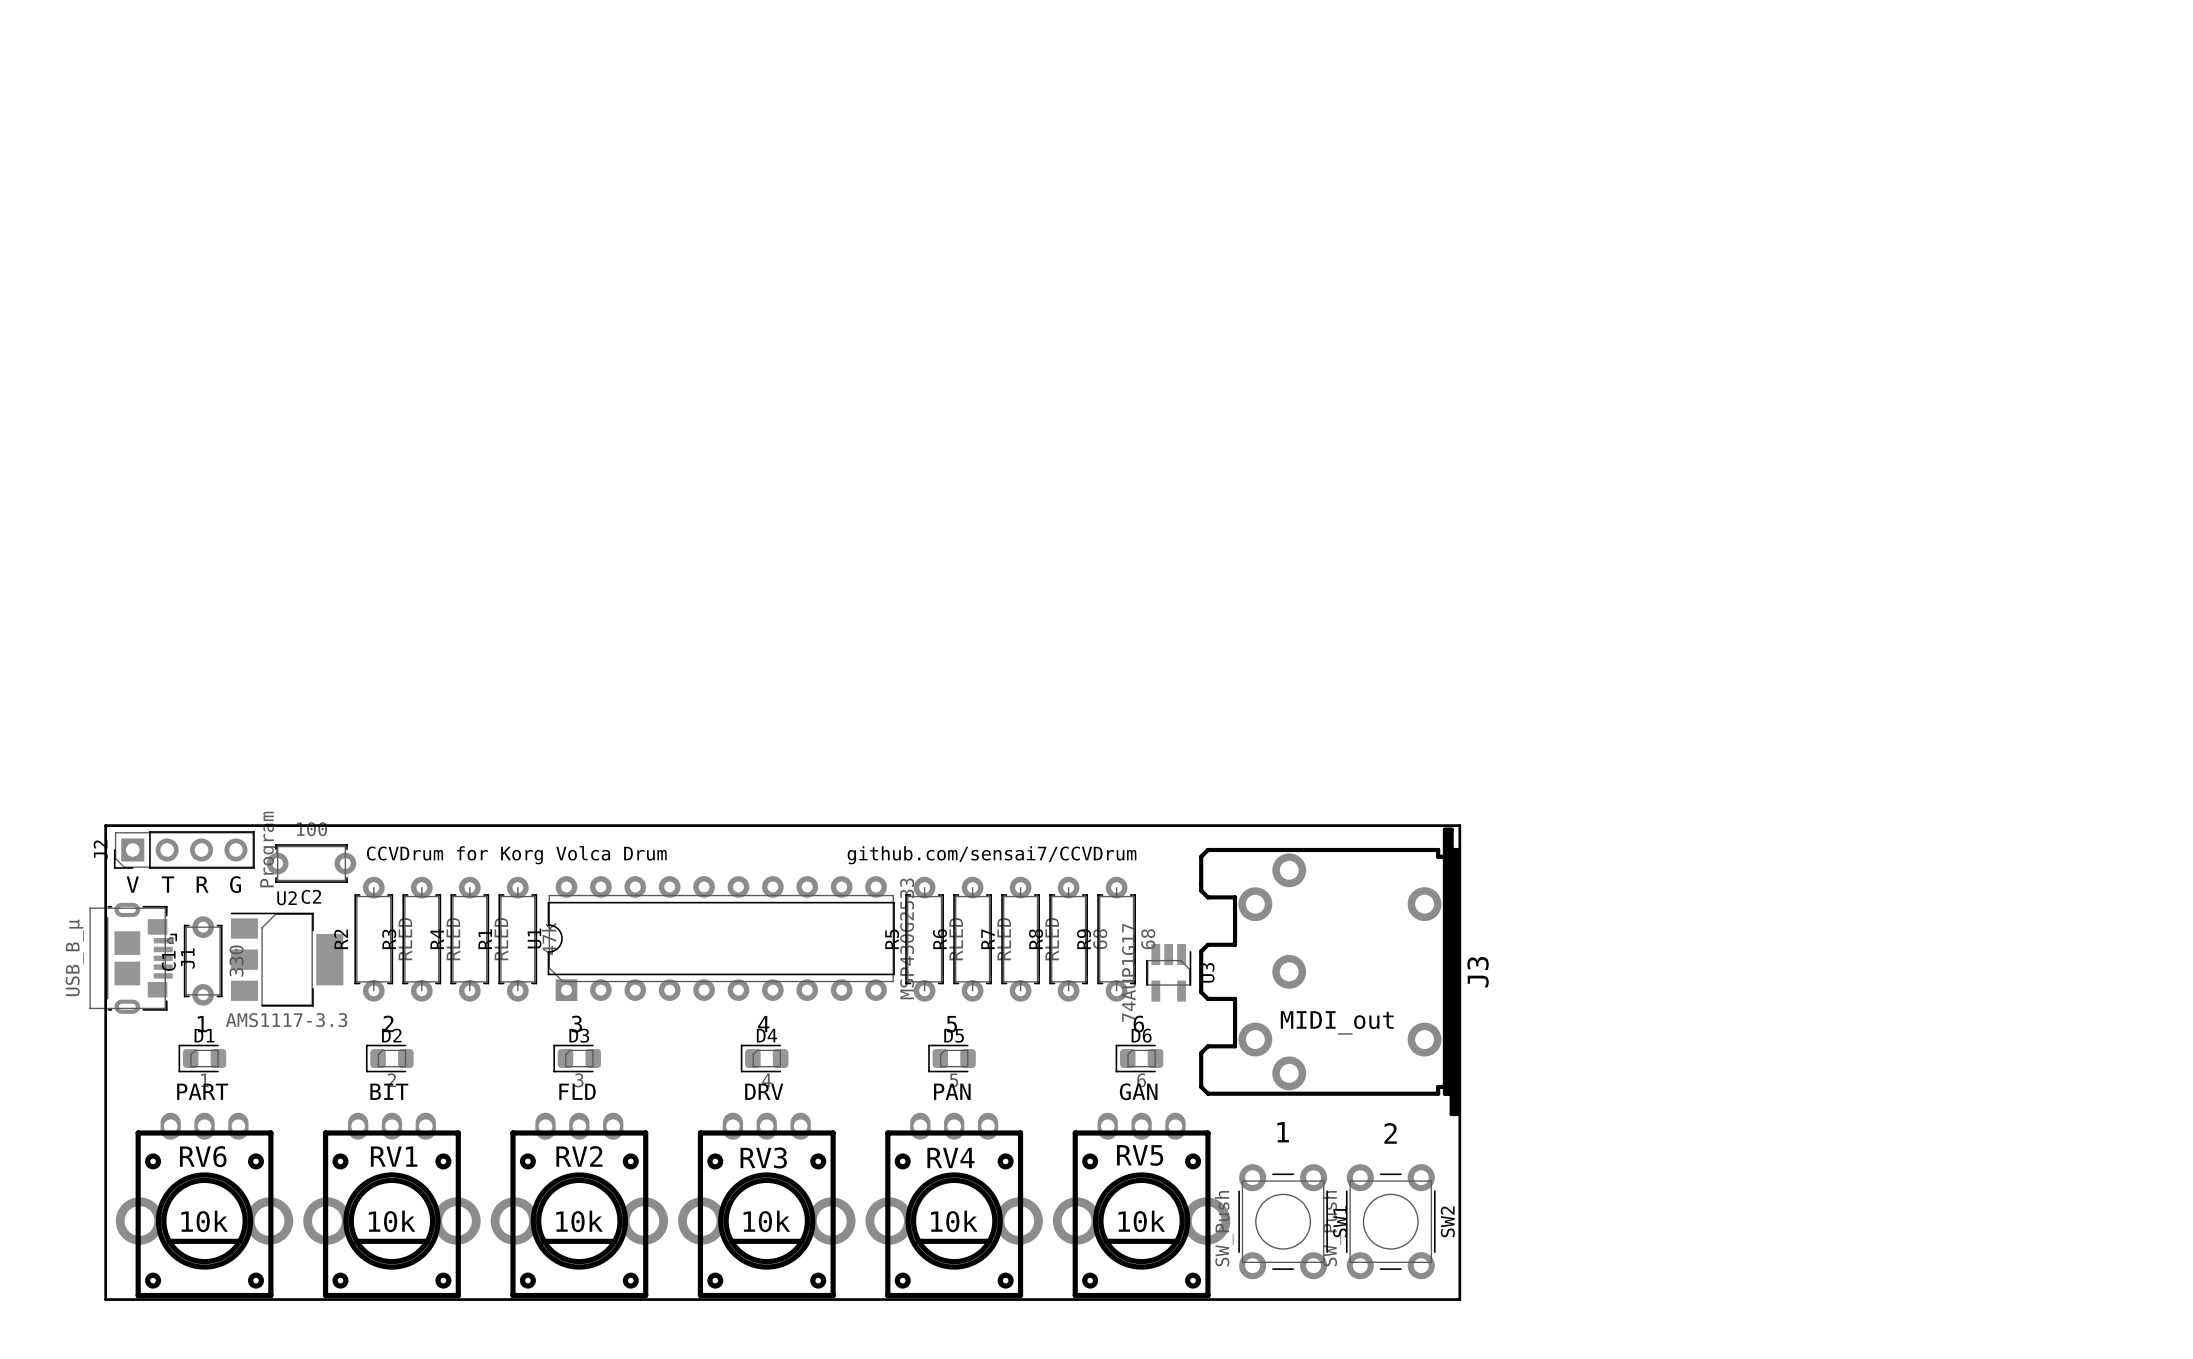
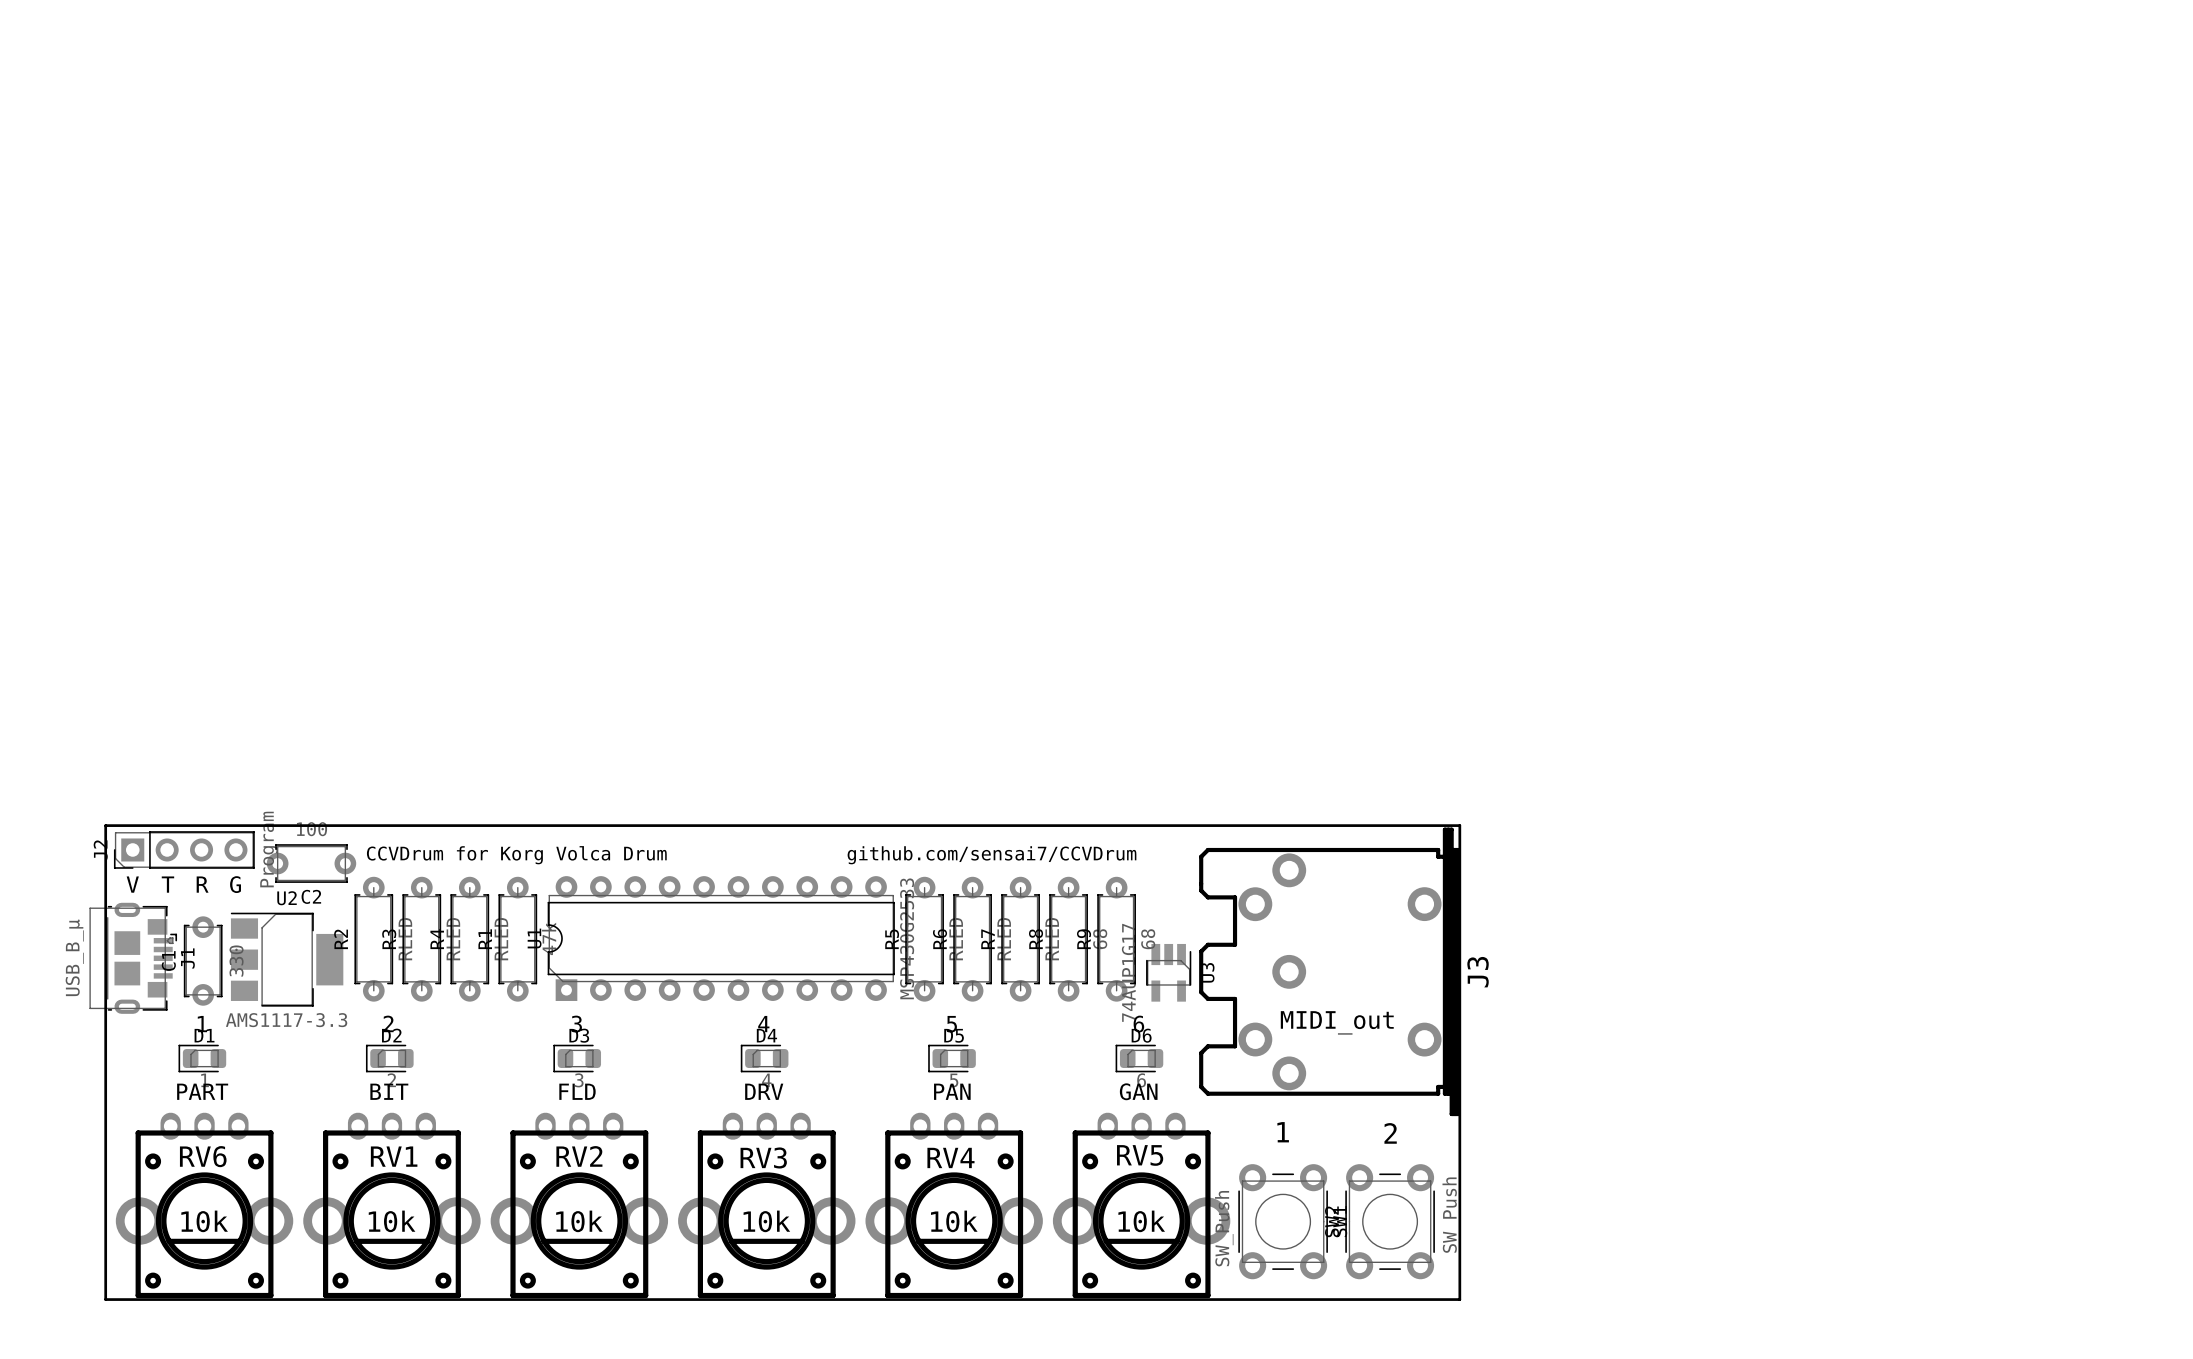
SW2 rotation: 0° (1390, 1221) -> 180° (1390, 1221)

